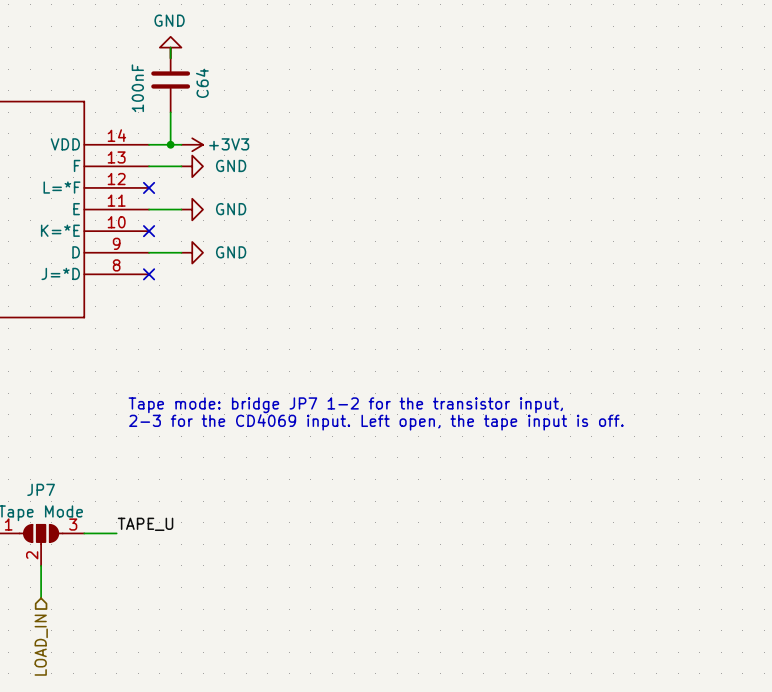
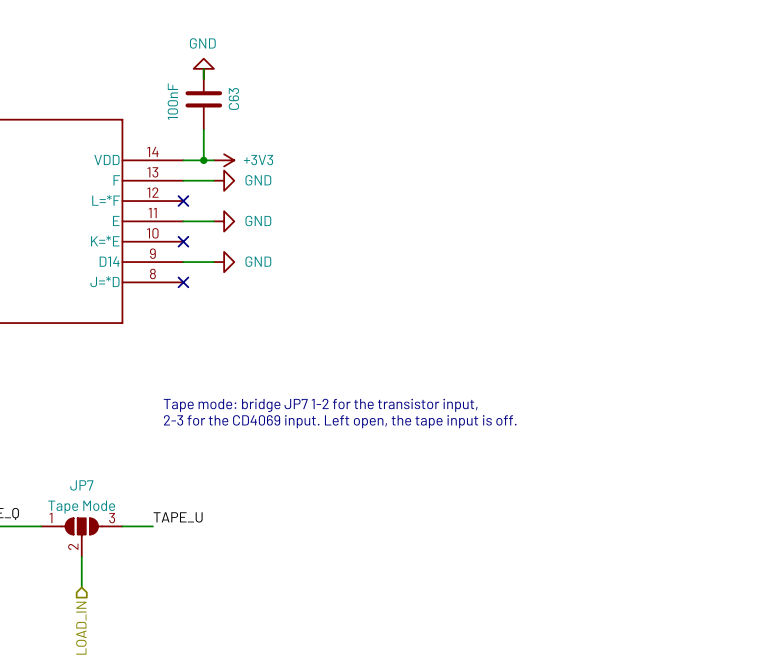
C64 name: C64 (202, 83) -> C63 (233, 98)
part pin name: D (76, 252) -> D14 (109, 261)

